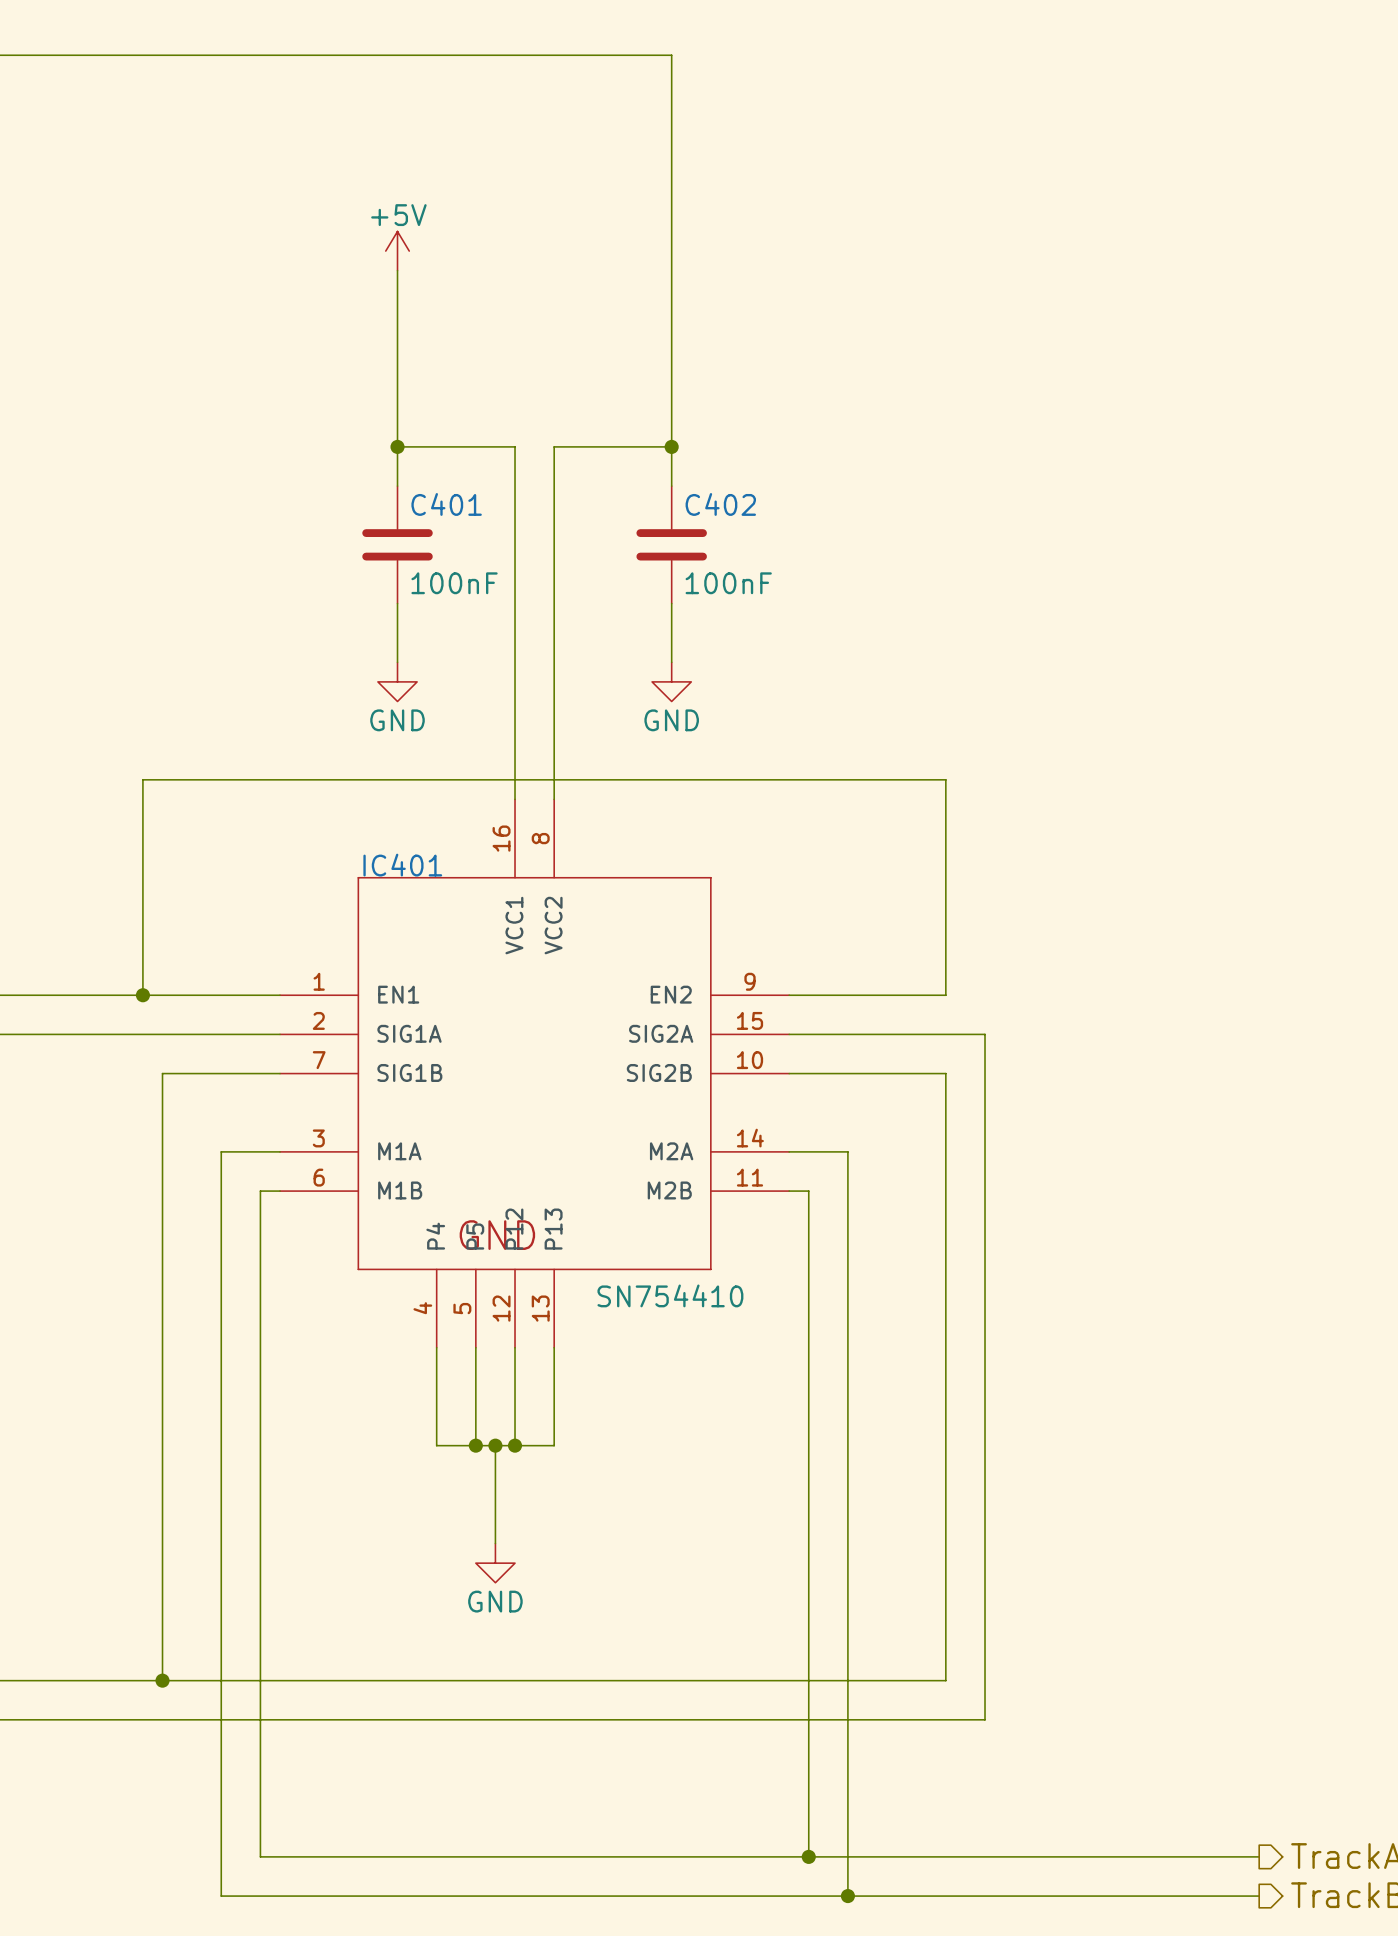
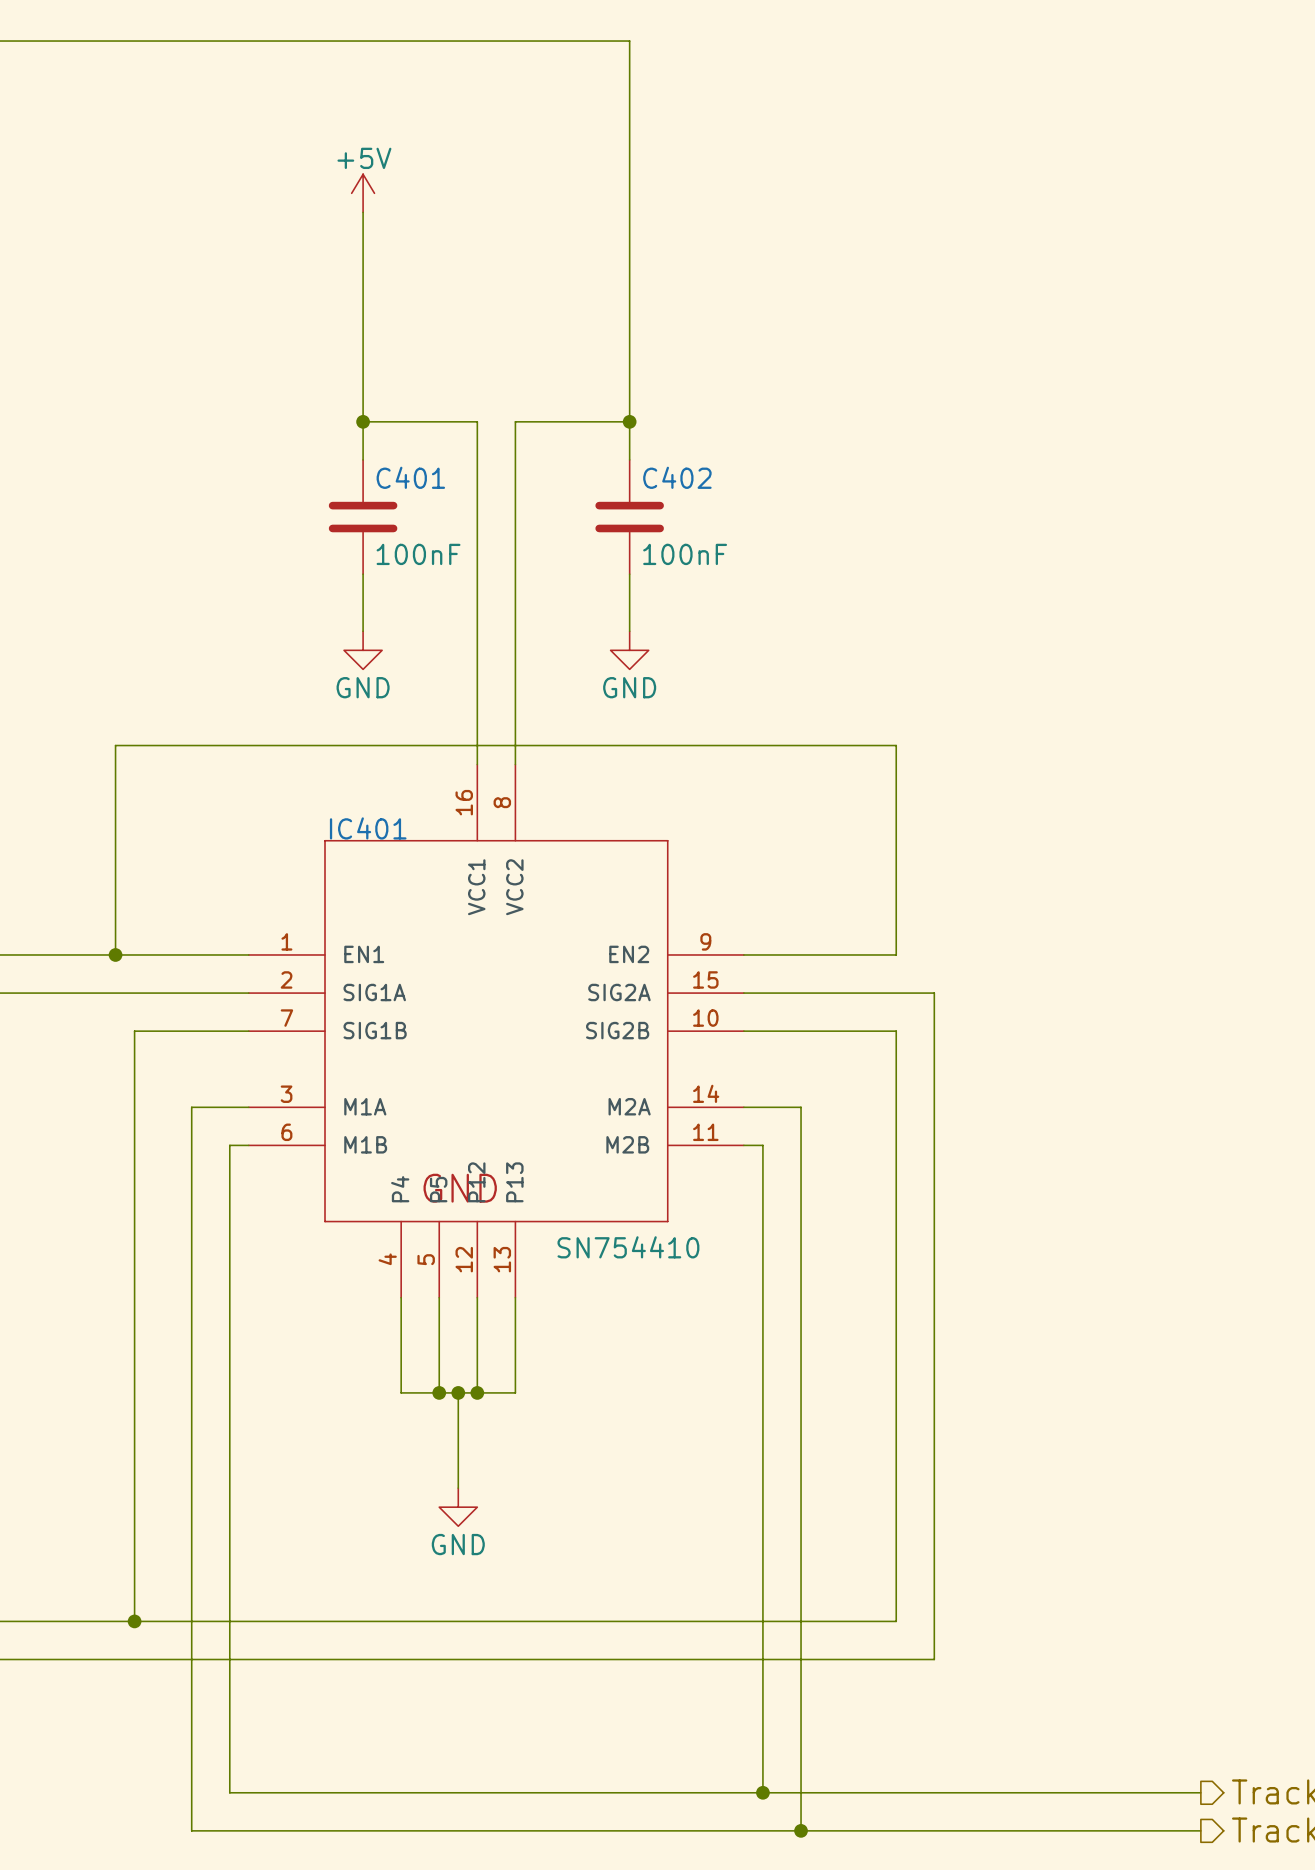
power symbol position: +5V (397, 251) -> +5V (363, 193)

